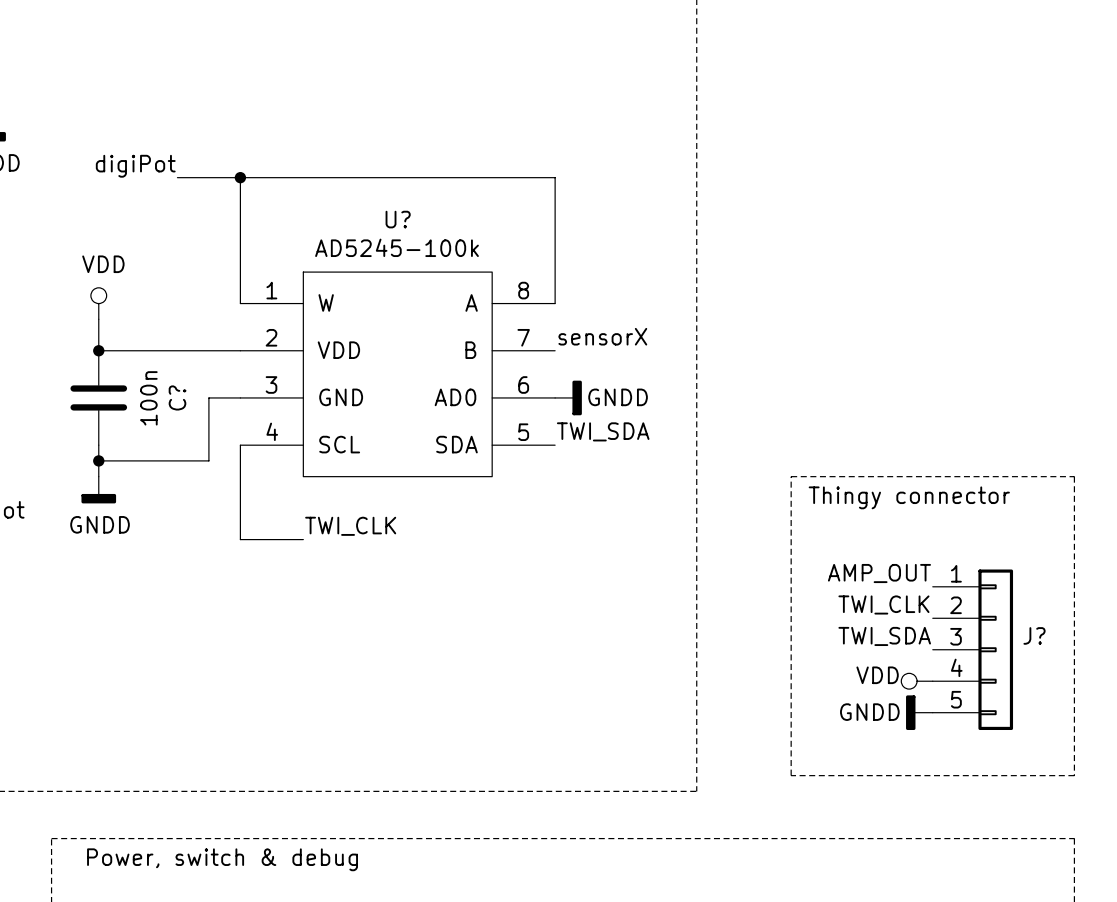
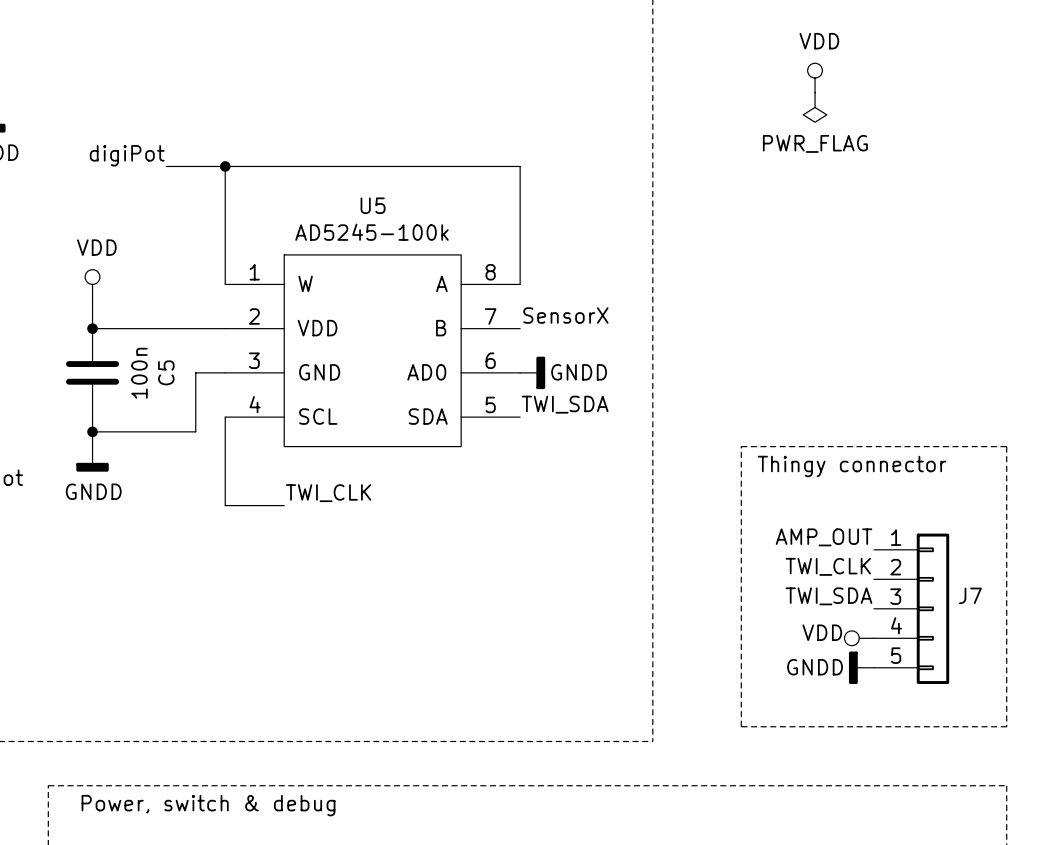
power symbol: none -> VDD (815, 78)
power symbol: none -> PWR_FLAG (815, 107)
U? name: U? (398, 219) -> U5 (373, 205)
label: sensorX (602, 336) -> SensorX (565, 315)
C? name: C? (177, 397) -> C5 (166, 372)
J? name: J? (1034, 635) -> J7 (970, 595)

